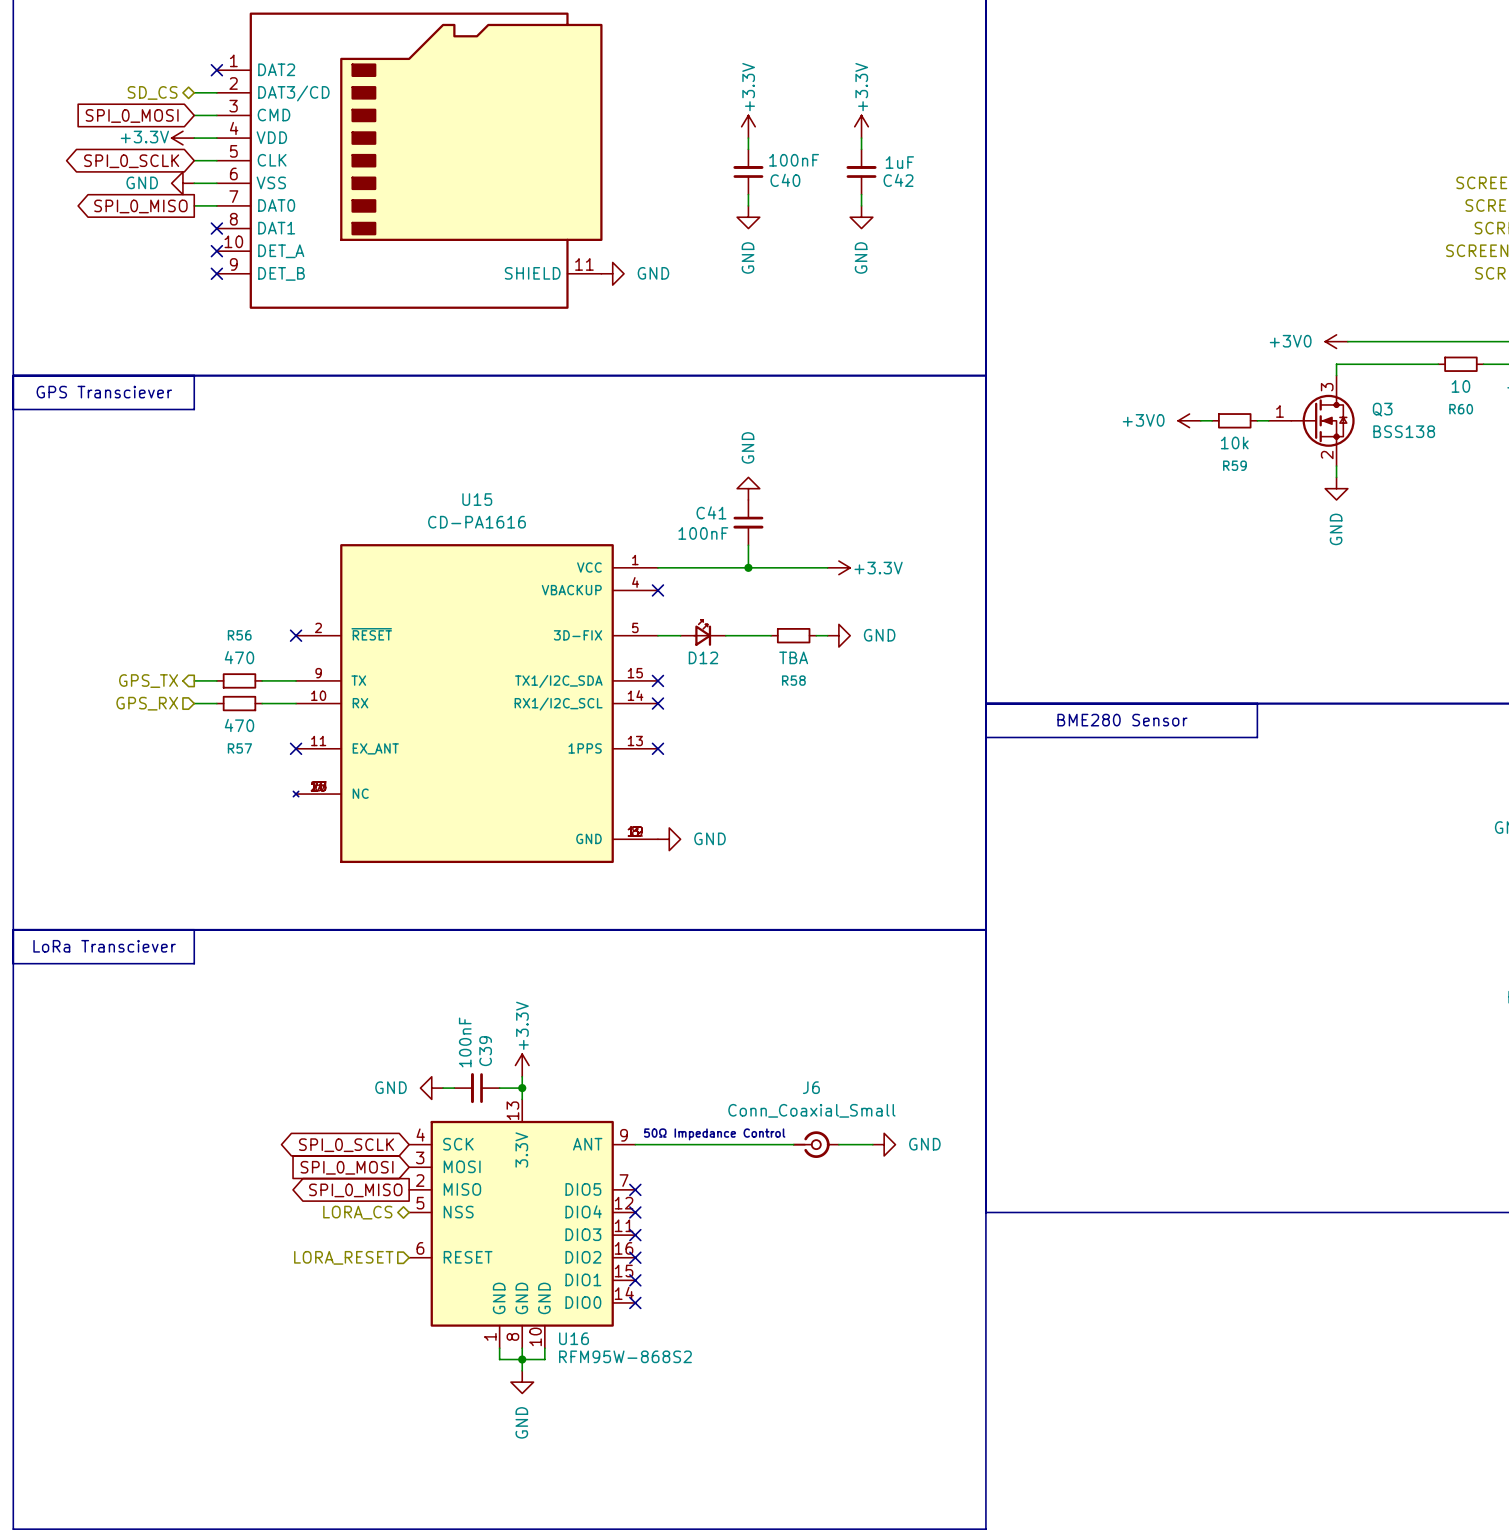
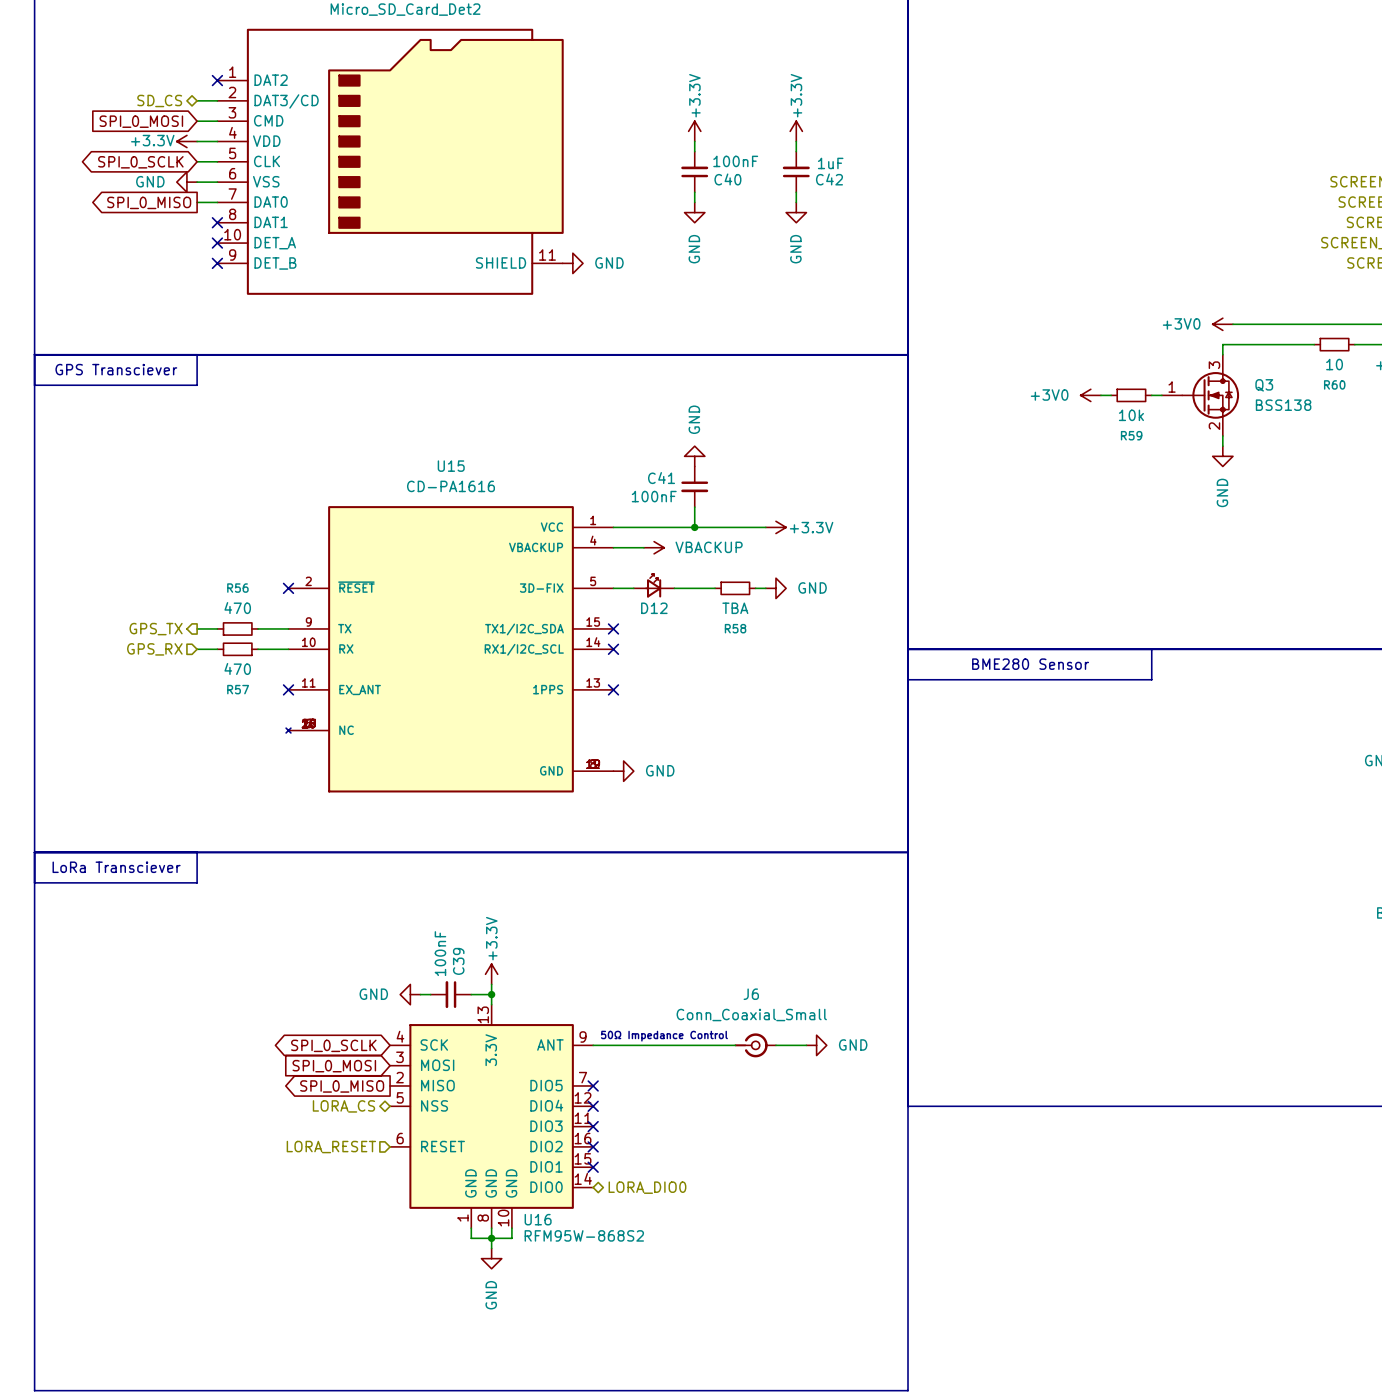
wire: none -> (613, 547) (643, 547)
no-connect mark: (657, 590) -> none
power symbol: none -> VBACKUP (654, 547)
no-connect mark: (635, 1302) -> none
hierarchical label: none -> LORA_DIO0 (647, 1187)

